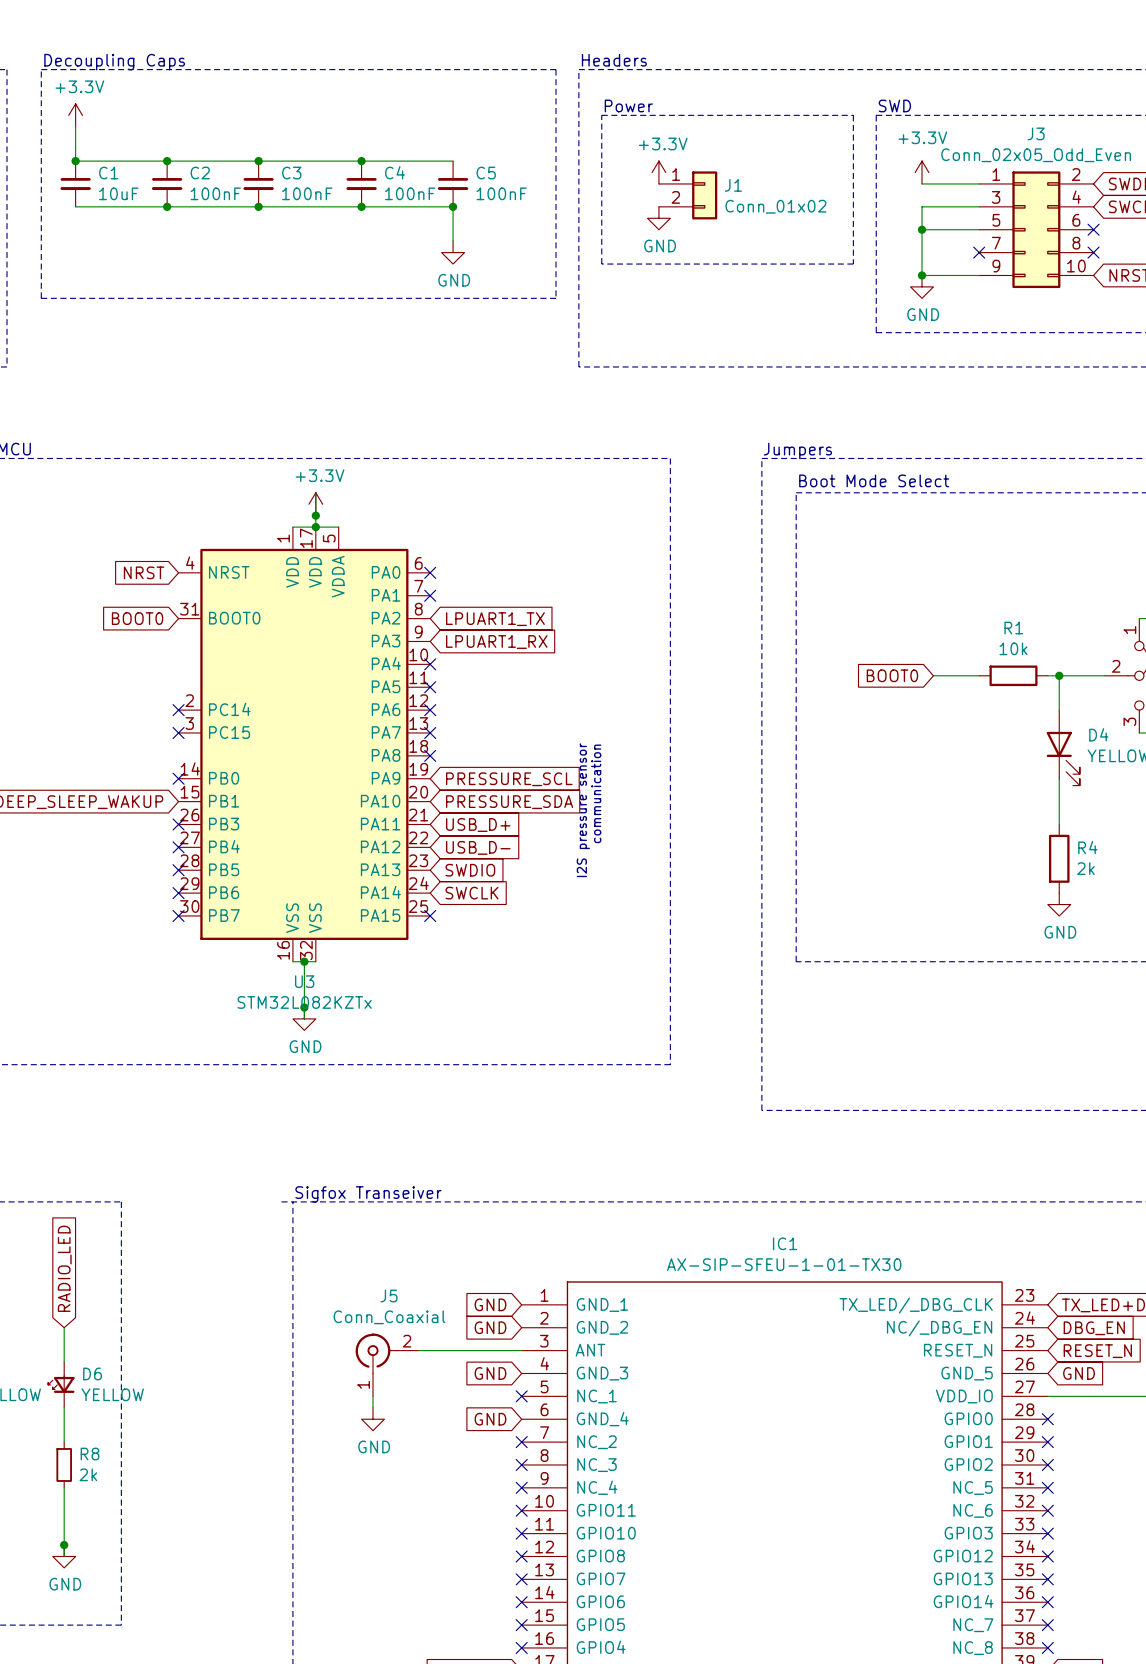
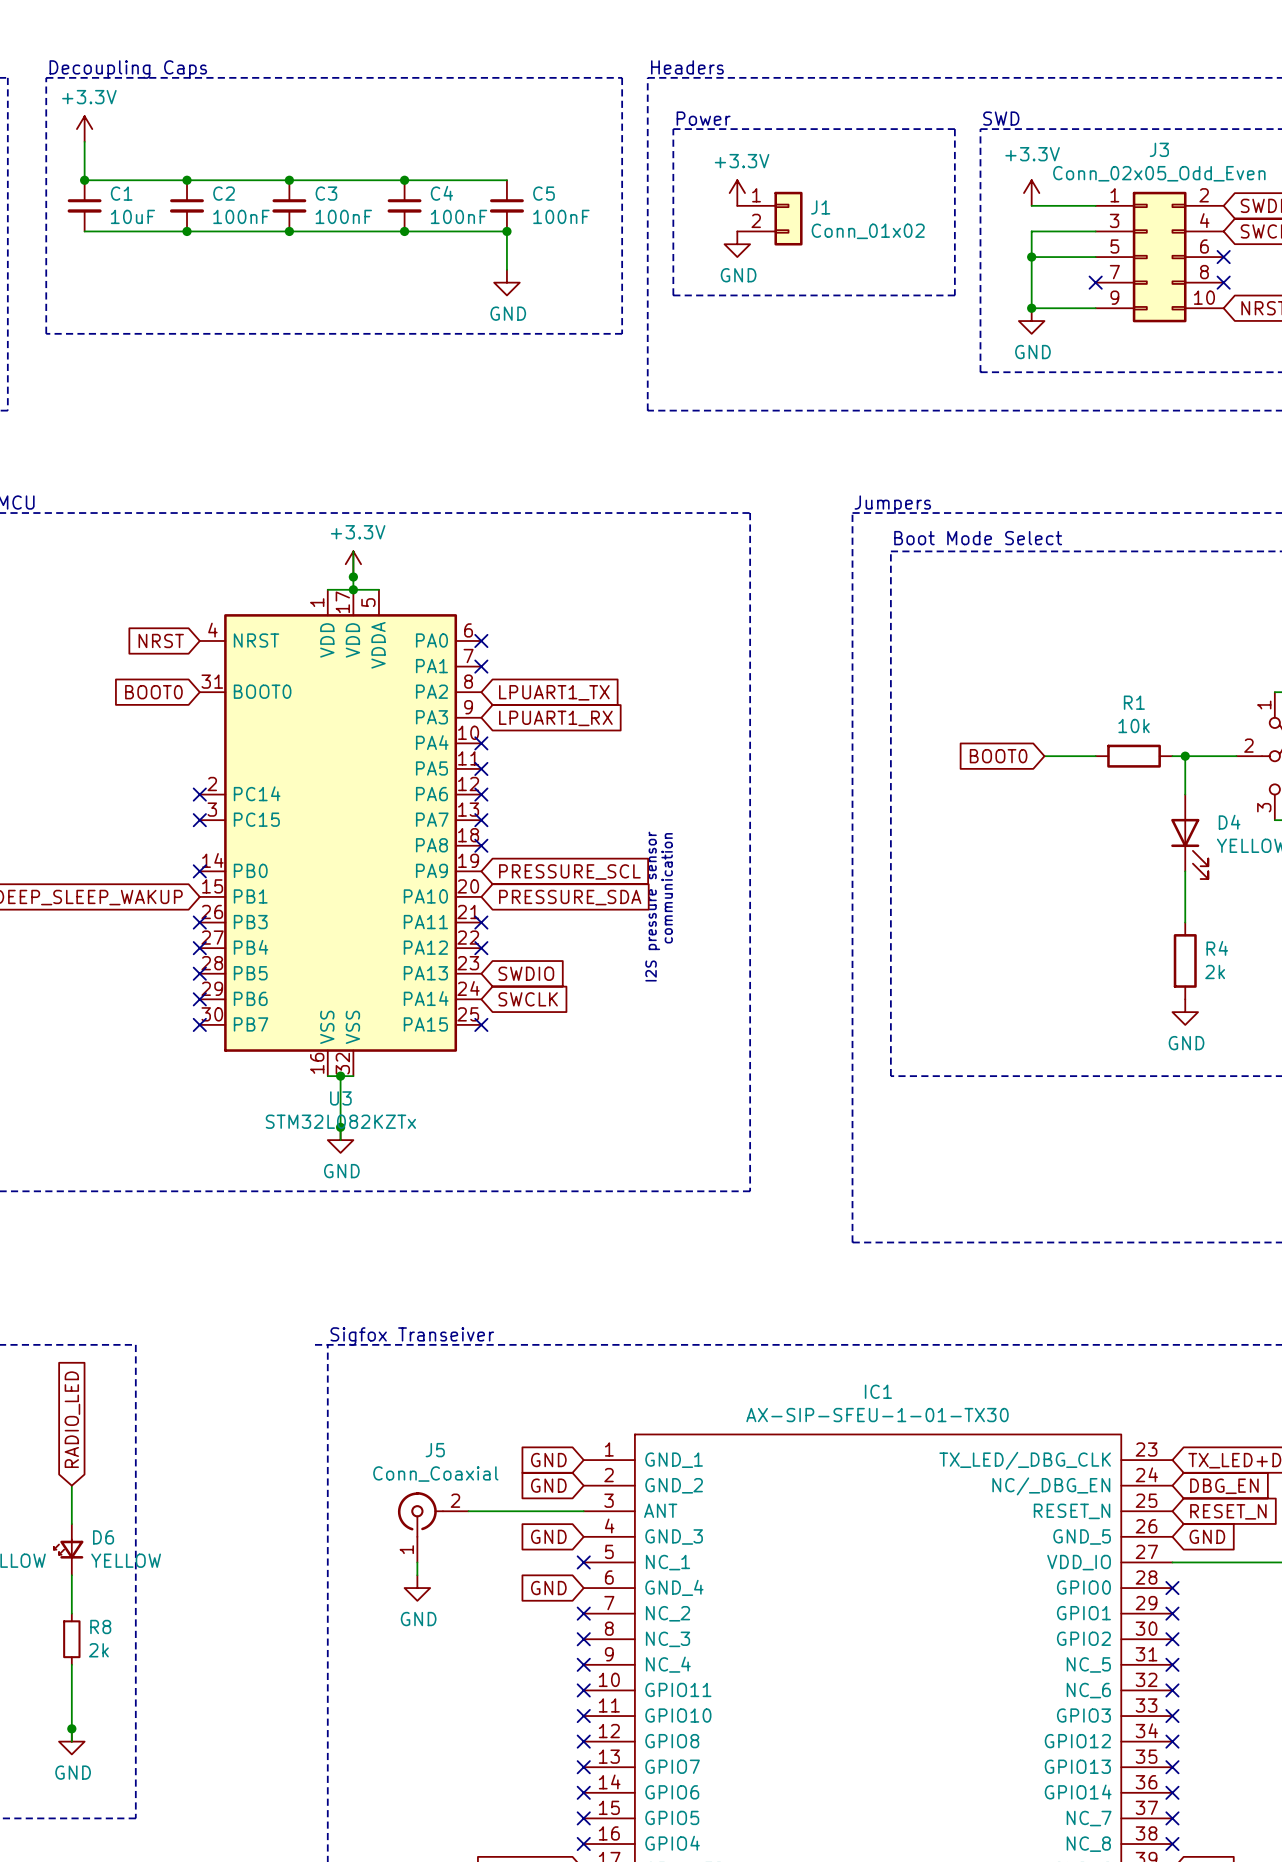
no-connect mark: none -> (481, 922)
global label: USB_D+ (478, 825) -> none
no-connect mark: none -> (481, 948)
global label: USB_D- (478, 847) -> none

